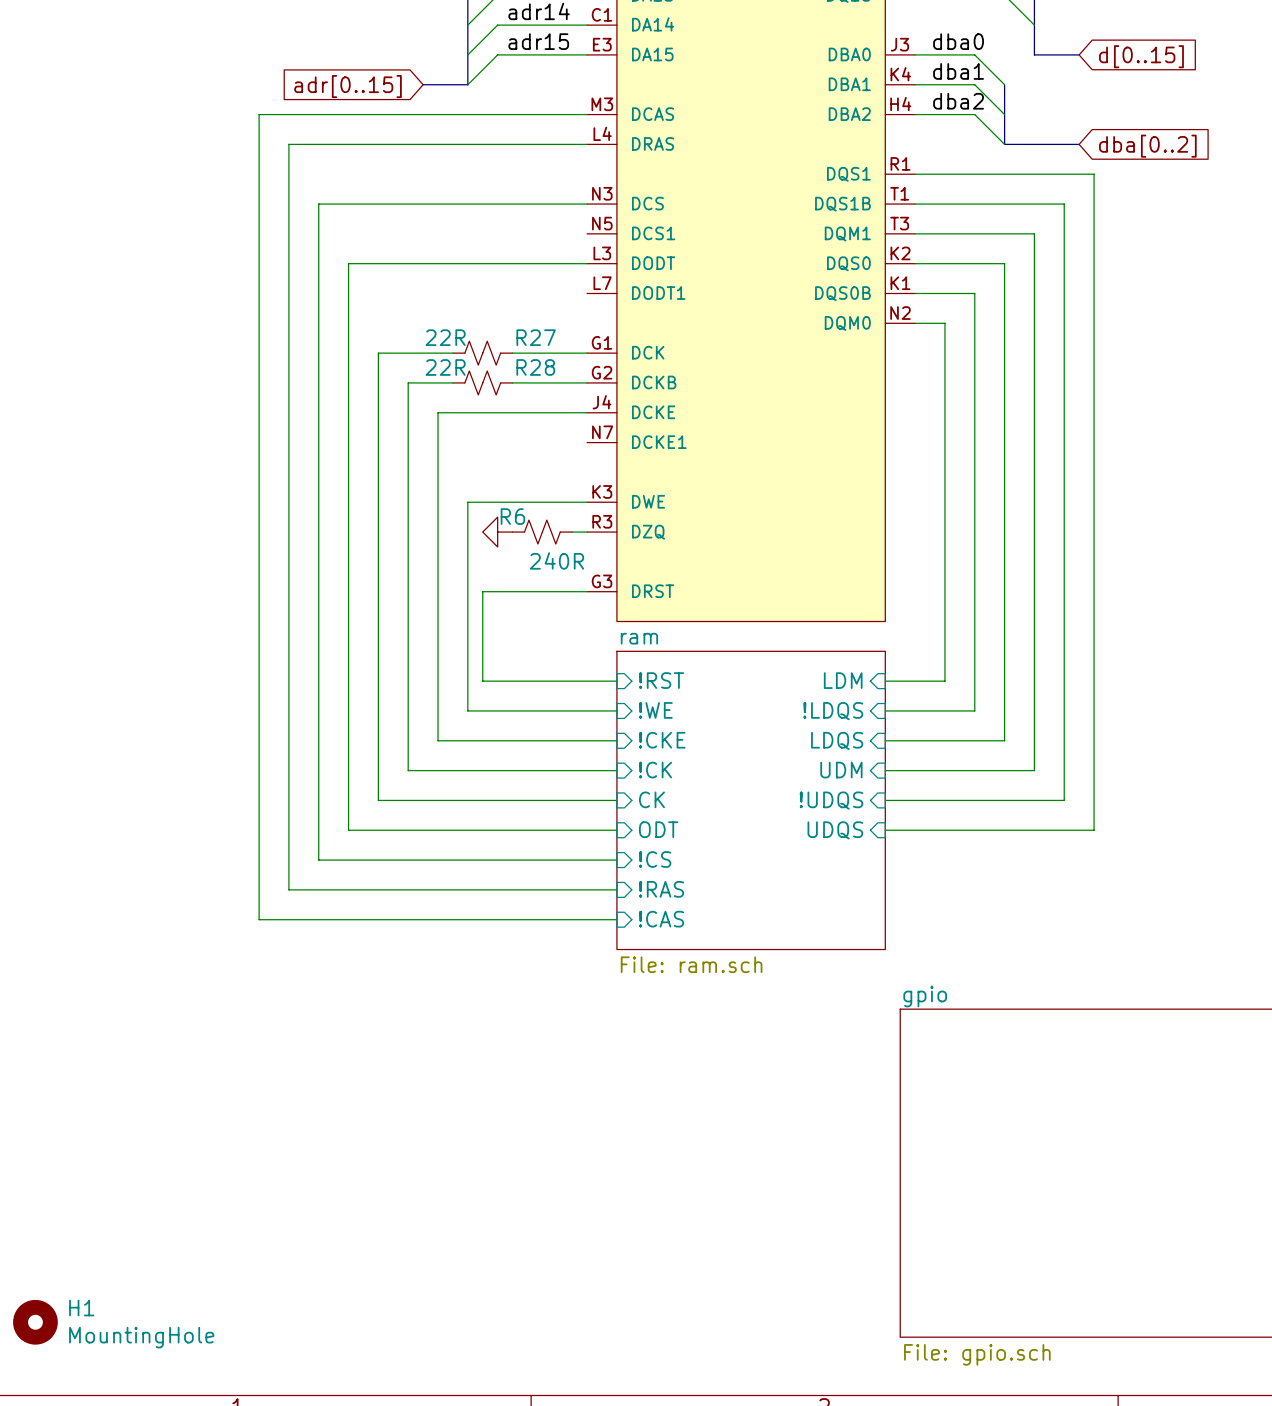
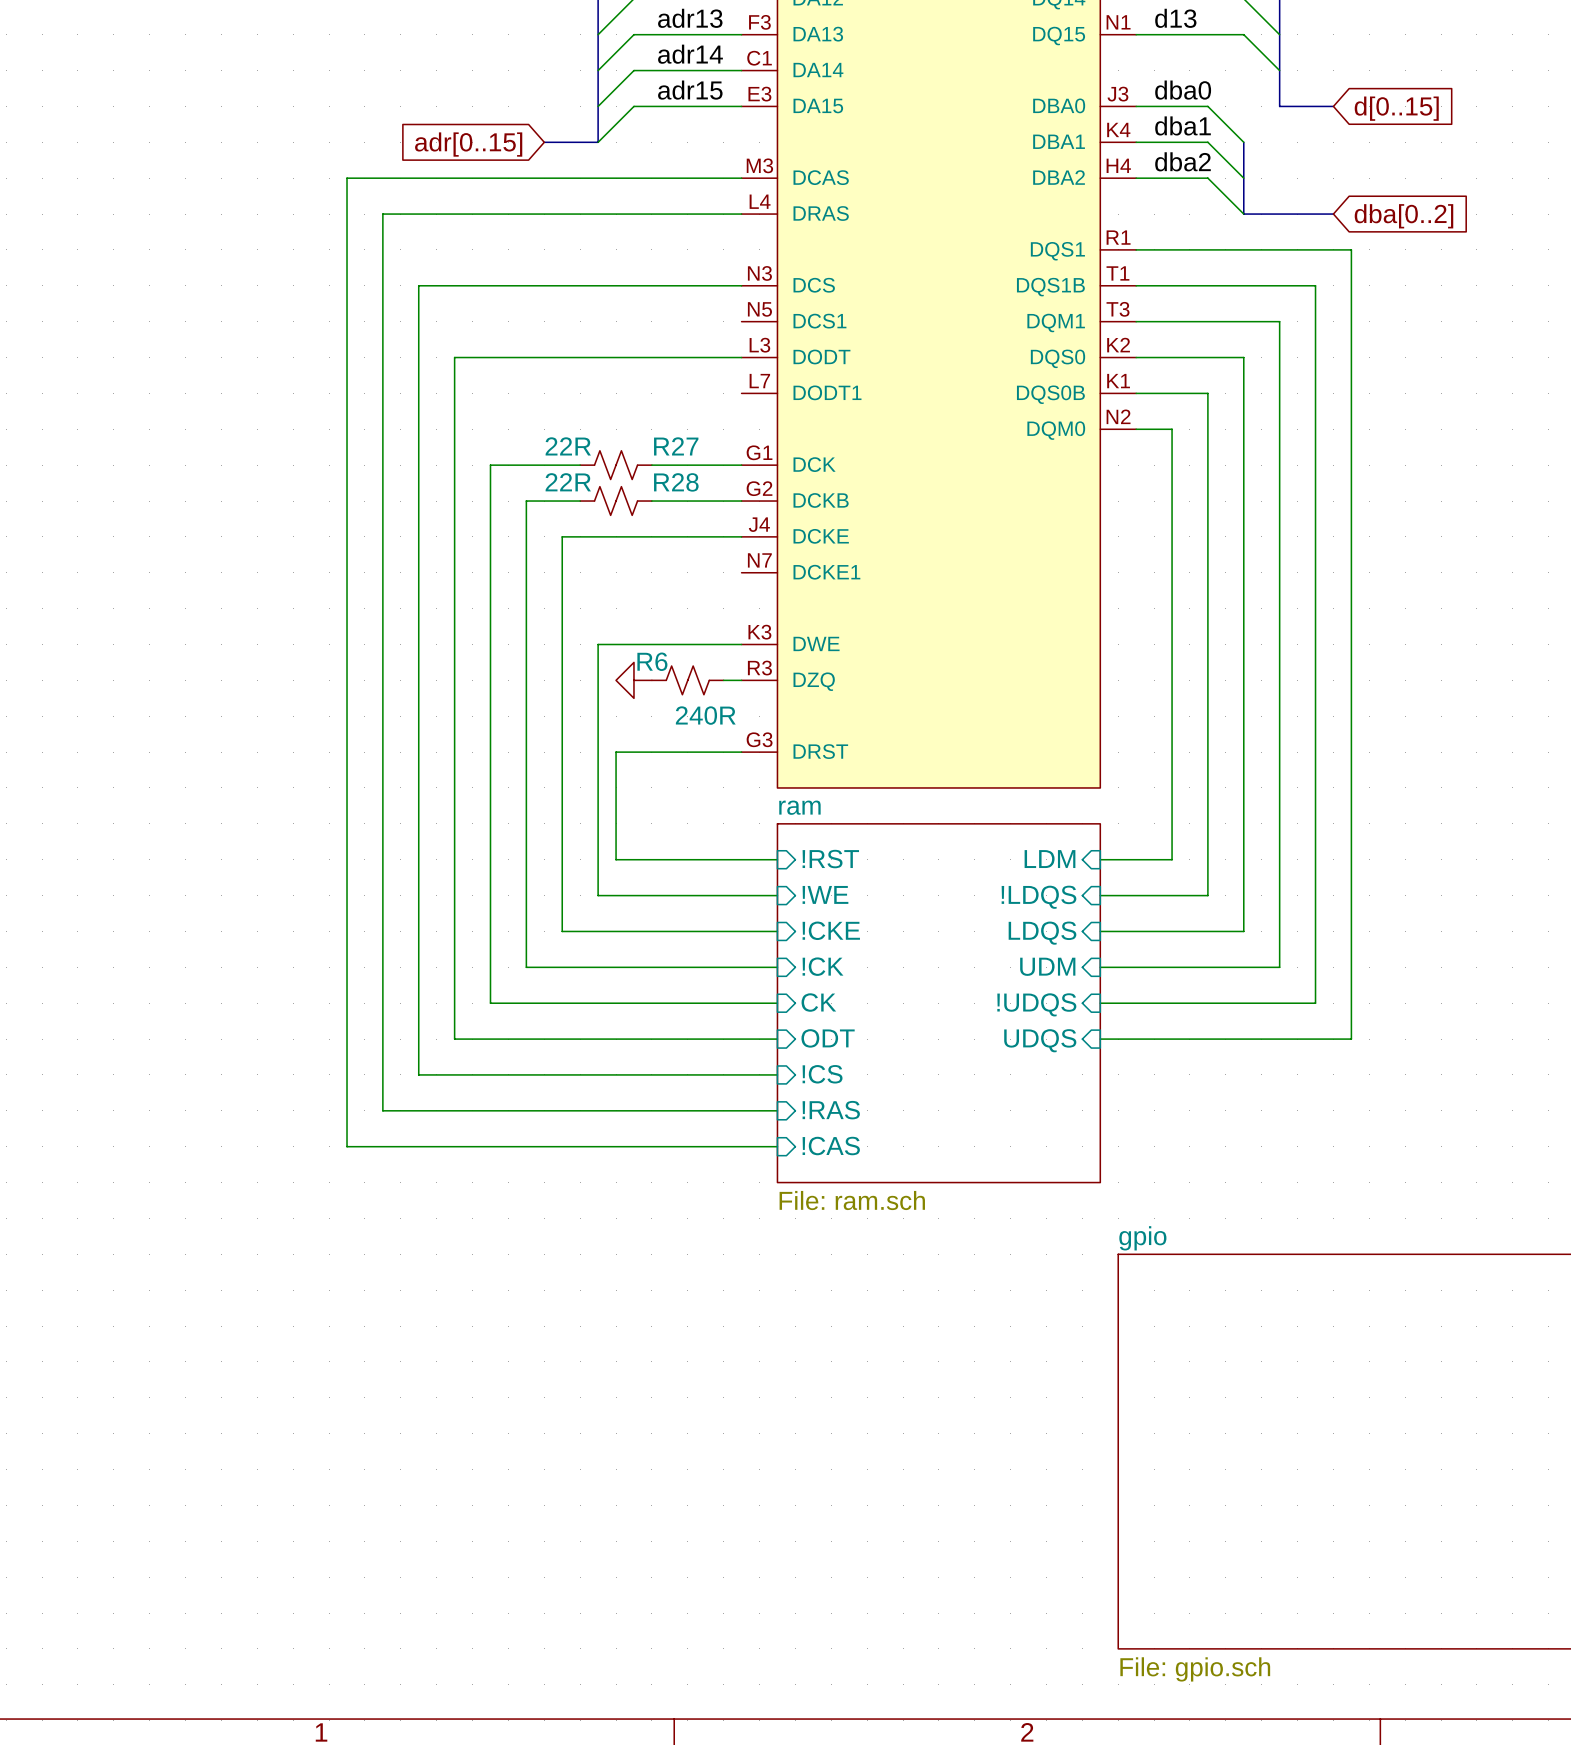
H1: MountingHole (35, 1322) -> none

